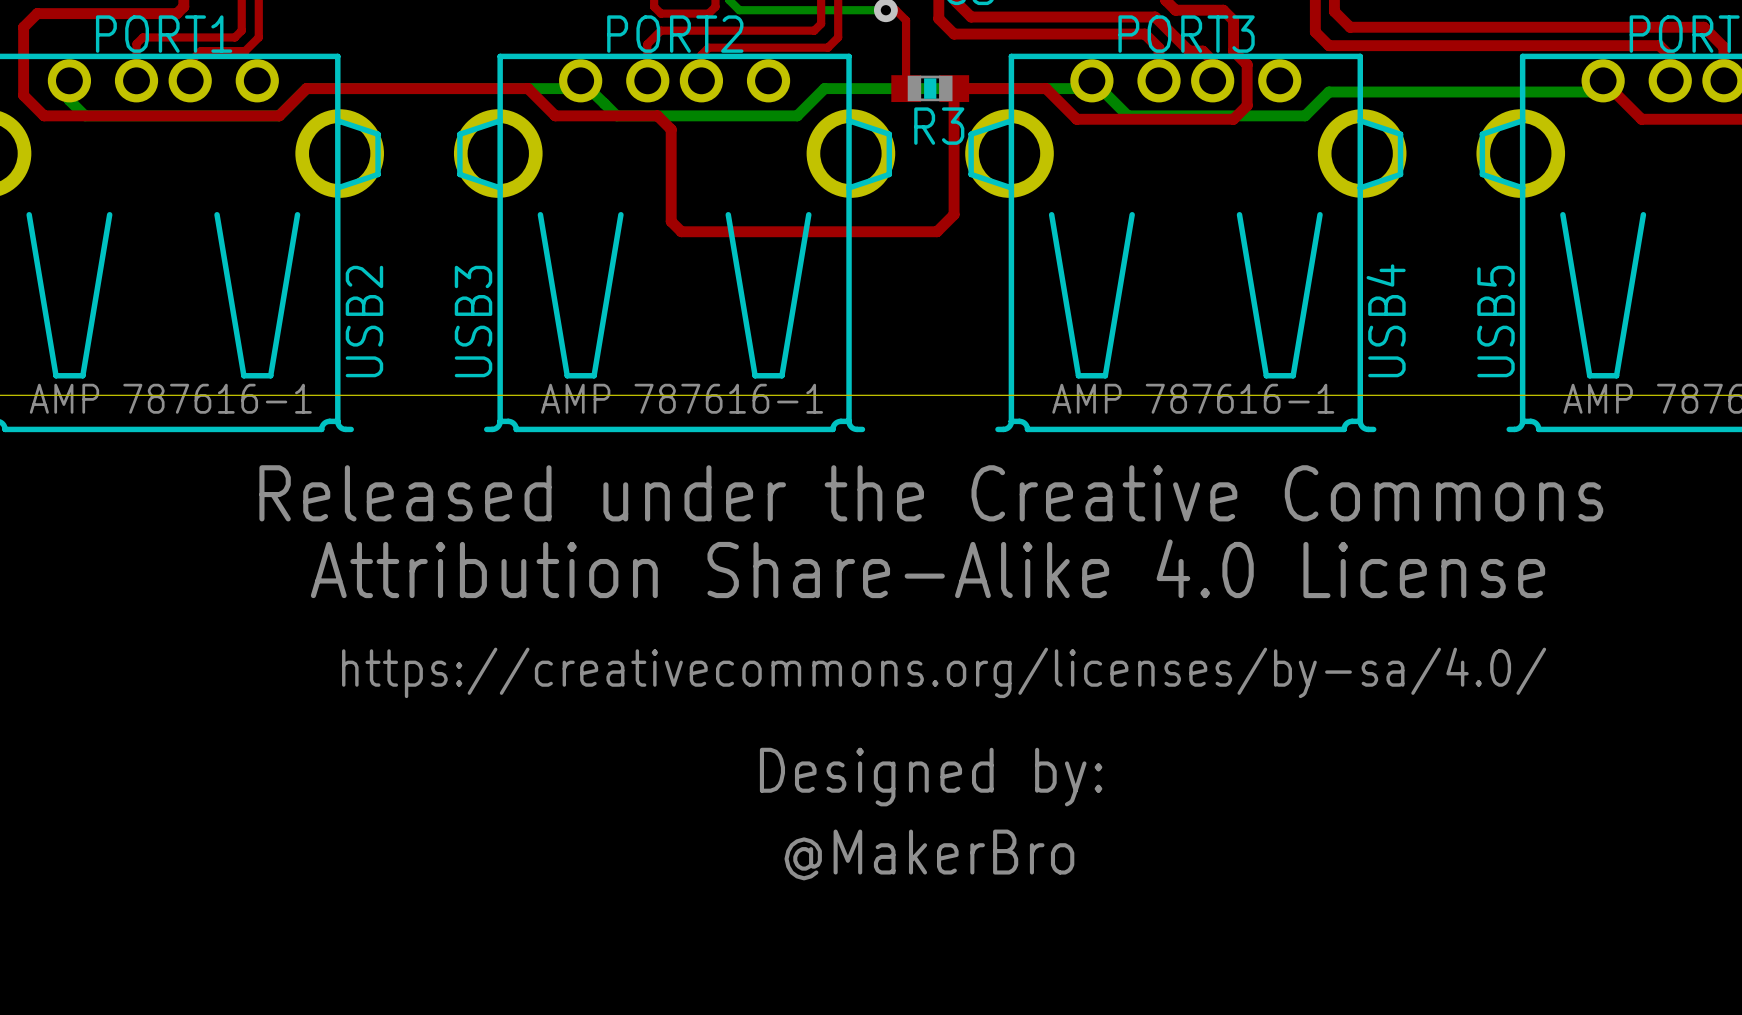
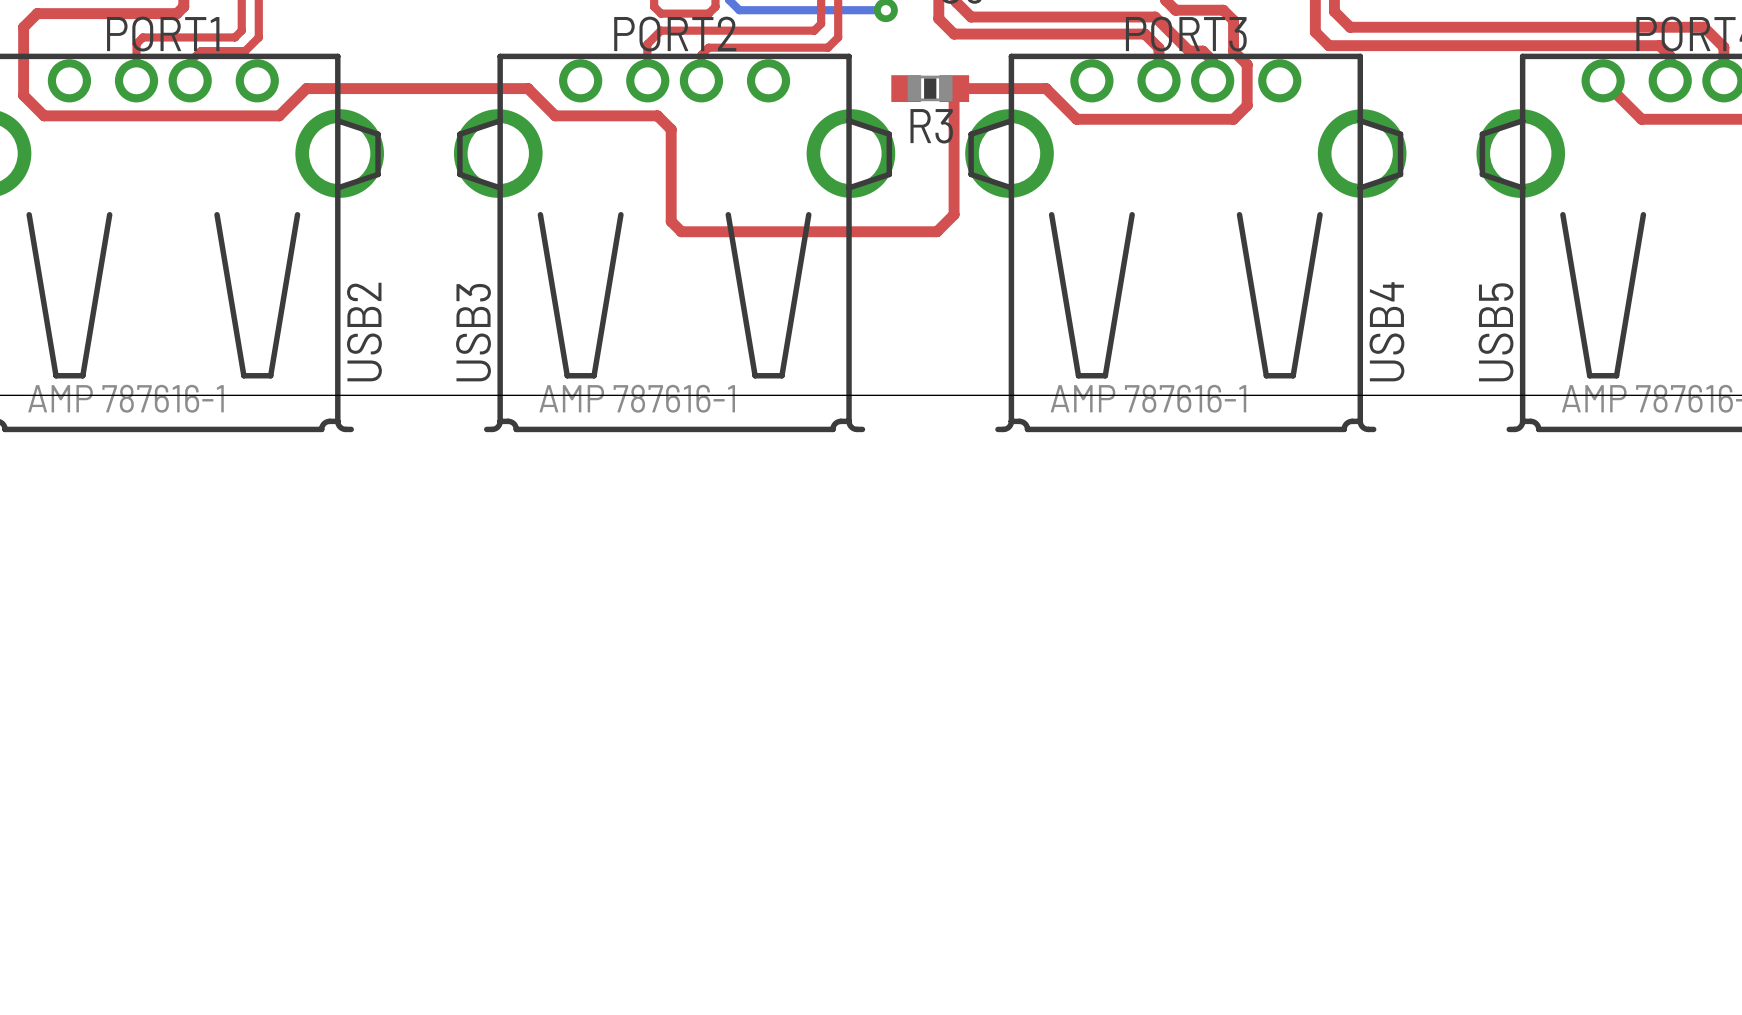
top track: (885, 10) (895, 10) (906, 20) (906, 88) -> none
bottom track: (69, 80) (69, 100) (84, 115) (279, 115) (306, 88) (572, 88) (580, 80) (616, 115) (797, 115) (824, 88) (1084, 88) (1091, 79) (1127, 115) (1305, 115) (1328, 92) (1591, 92) (1603, 80) -> none
drawing: [259, 465, 1604, 807] -> none
text: @MakerBro (929, 854) -> none

